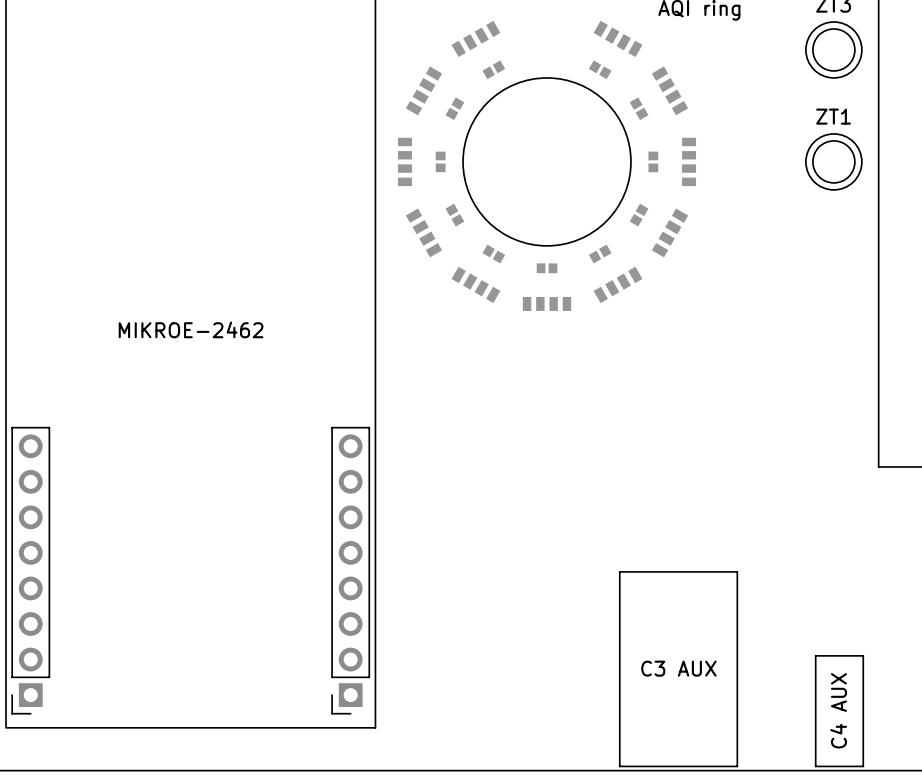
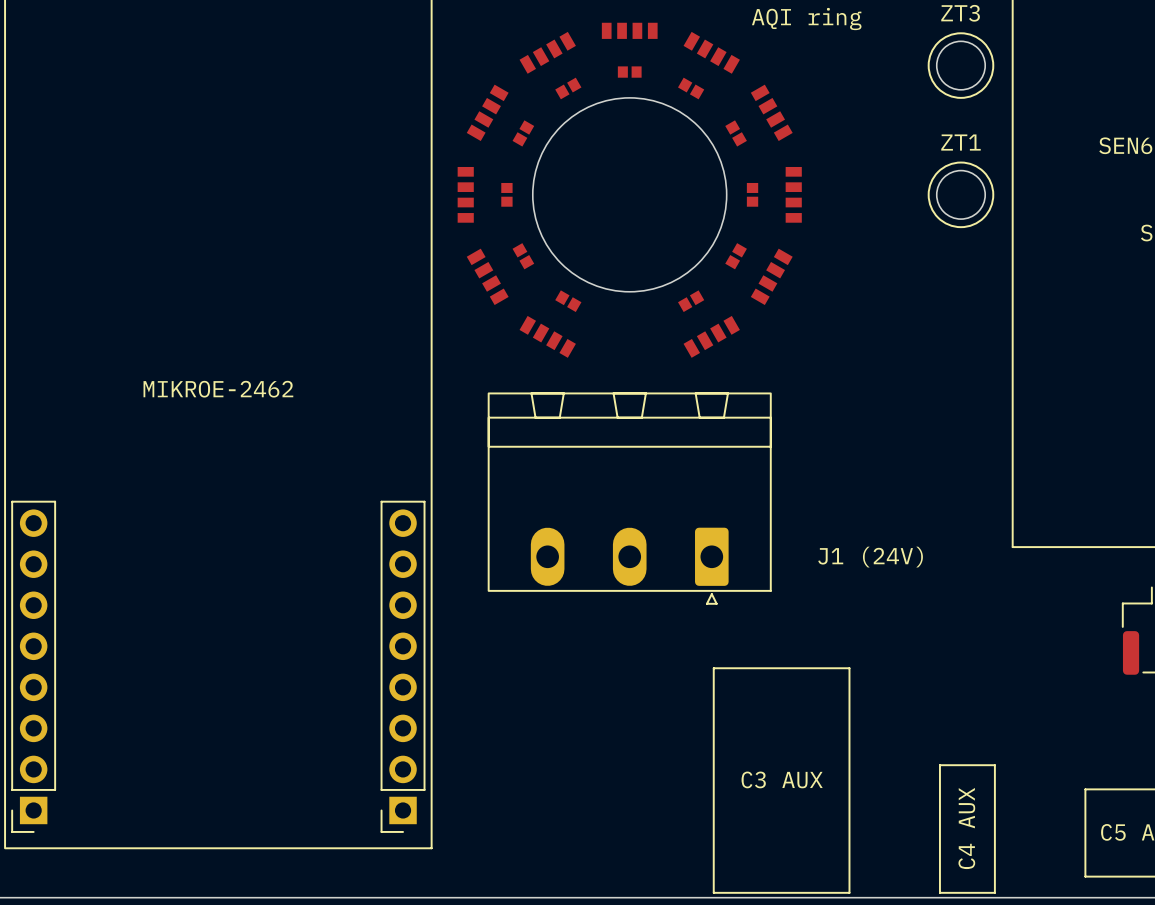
part position: (547, 268) -> (629, 72)
part position: (547, 303) -> (629, 30)
part: none -> (629, 498)
text: none -> J1 (24V) (870, 557)

